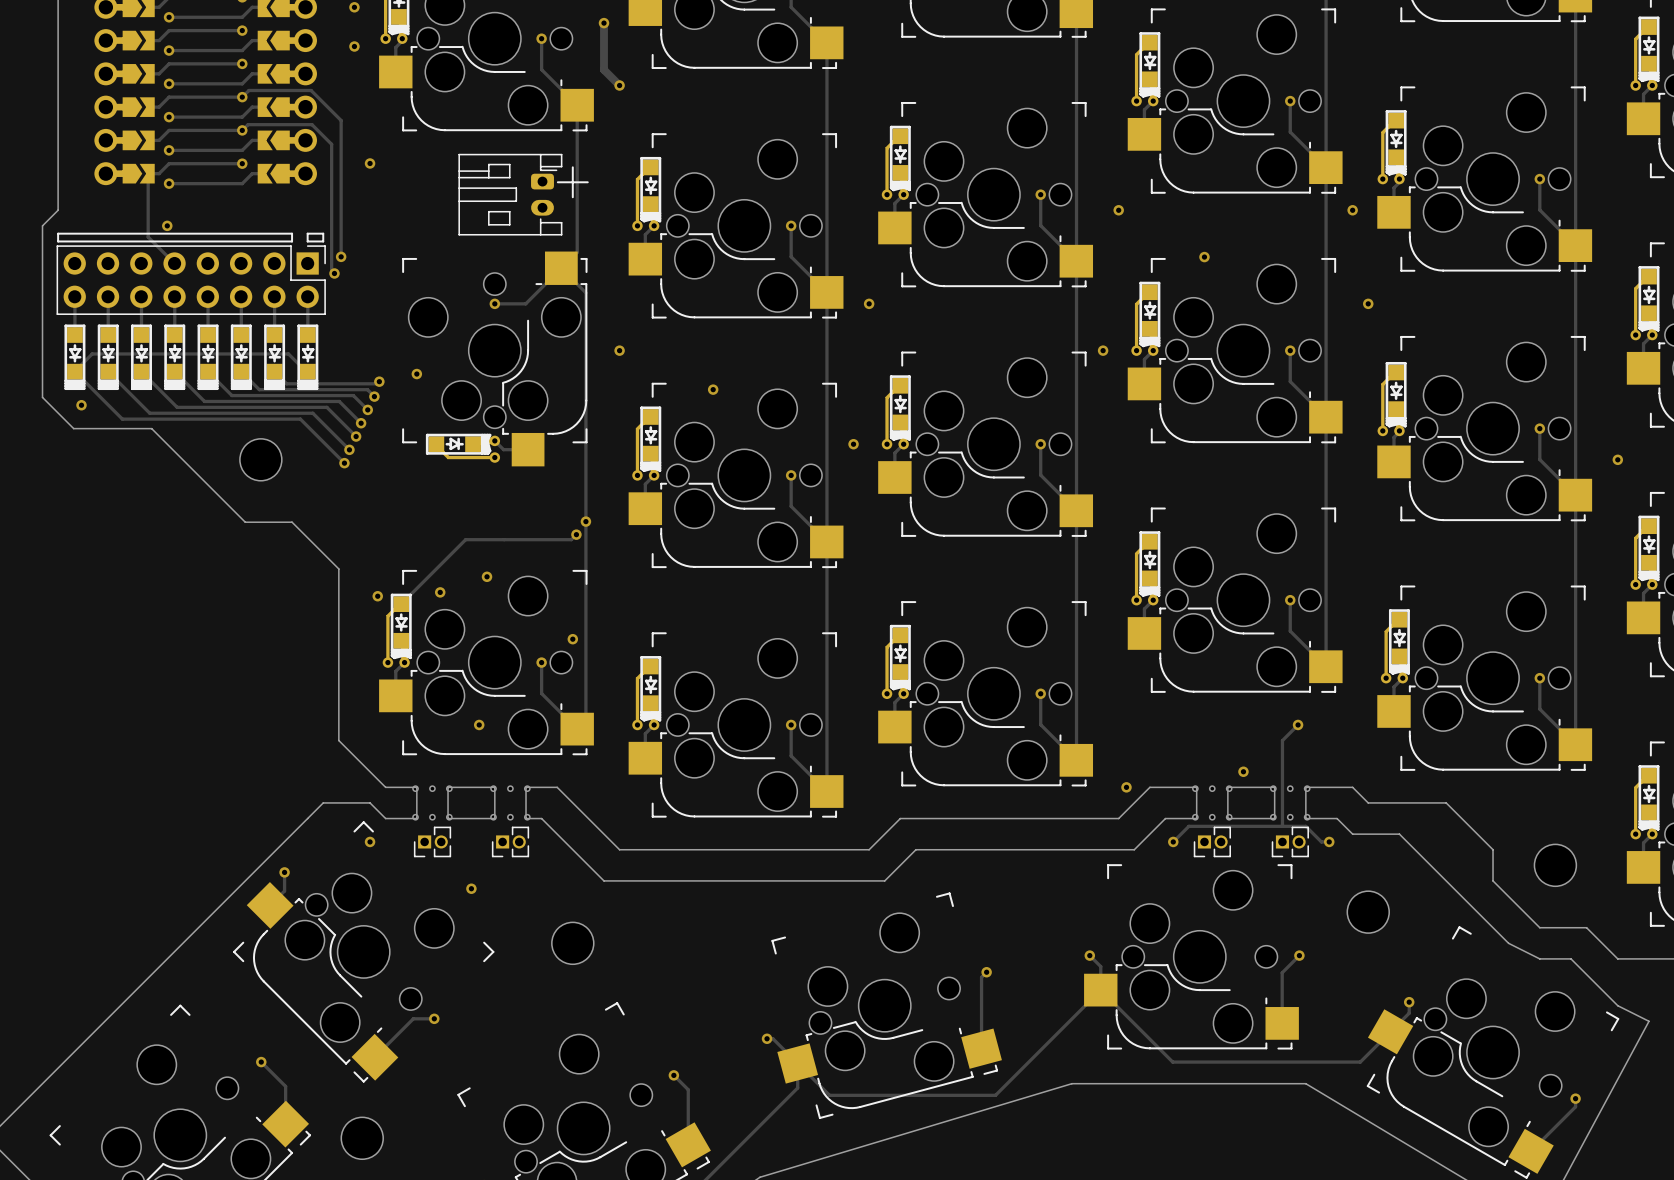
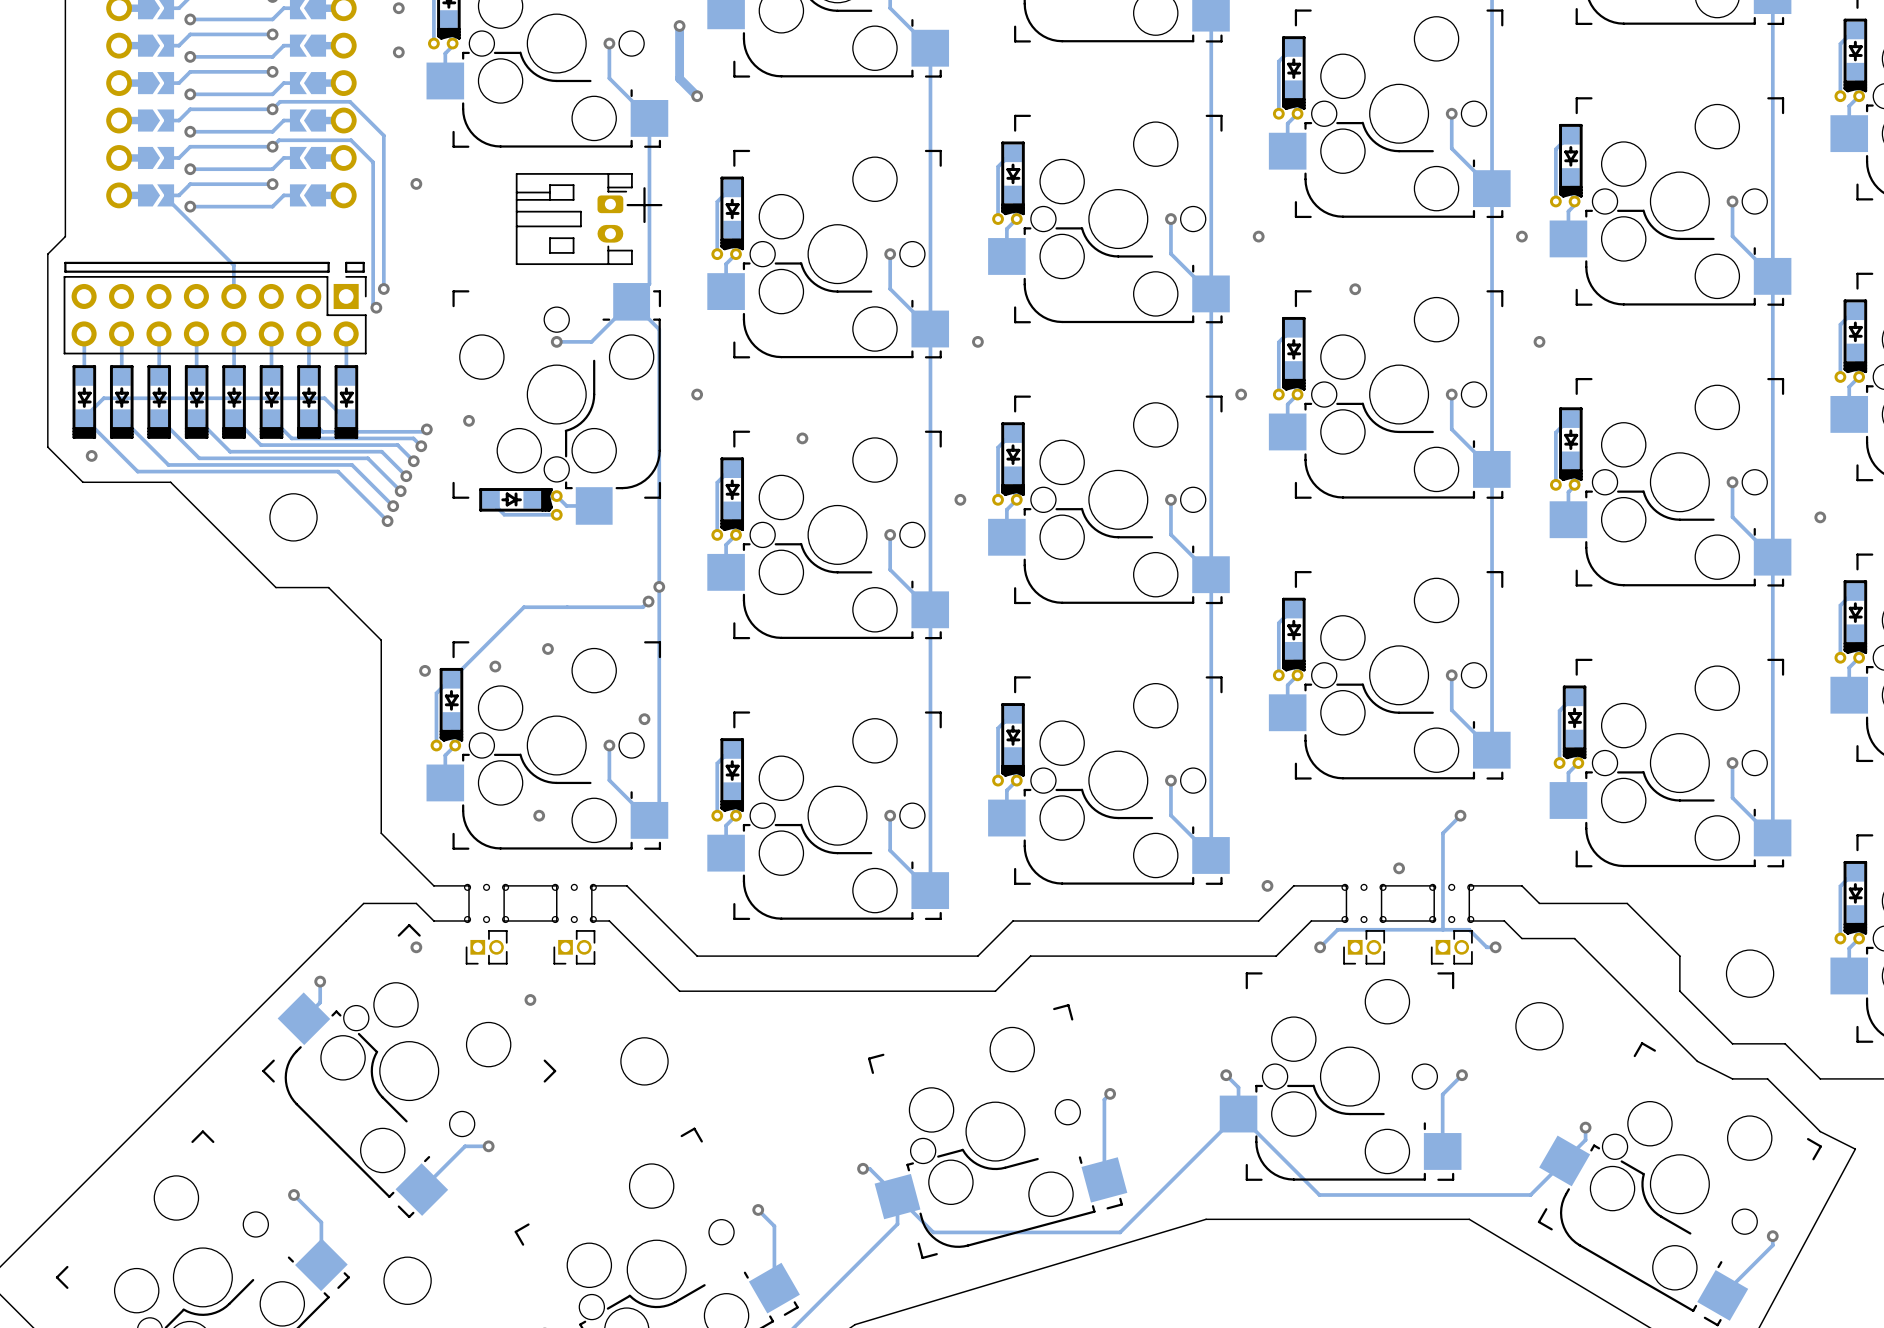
track: (148, 176) (148, 237) (174, 263) -> (166, 198) (233, 265) (233, 296)
via: (167, 225) -> none

